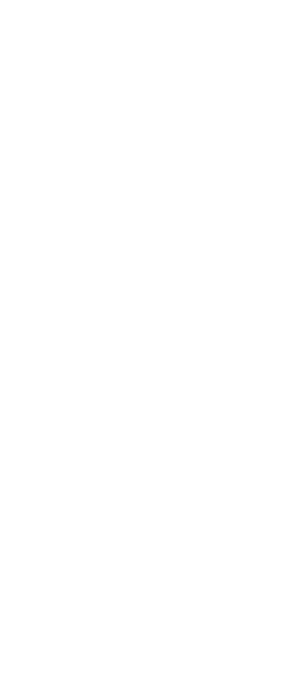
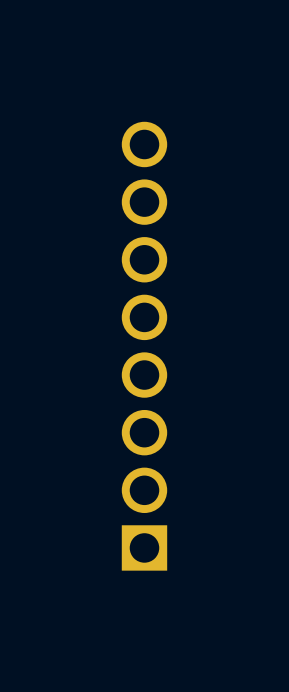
part: none -> (144, 346)

